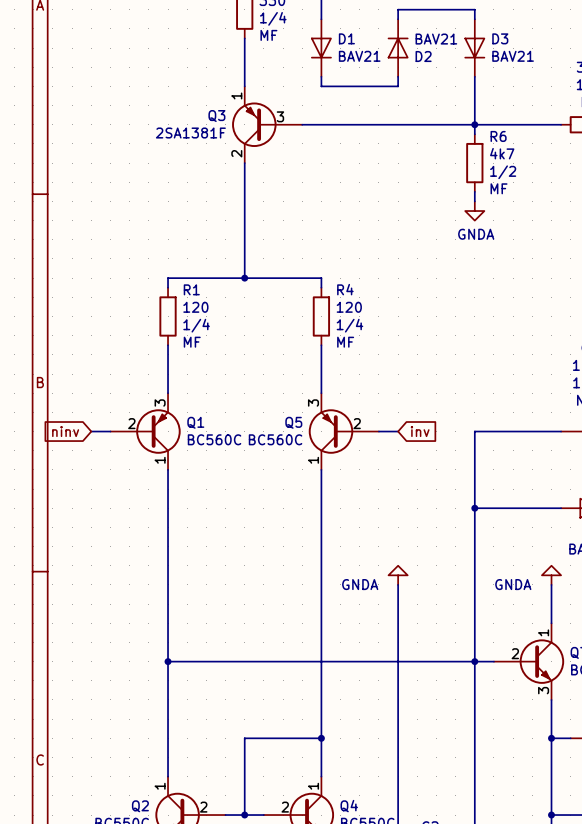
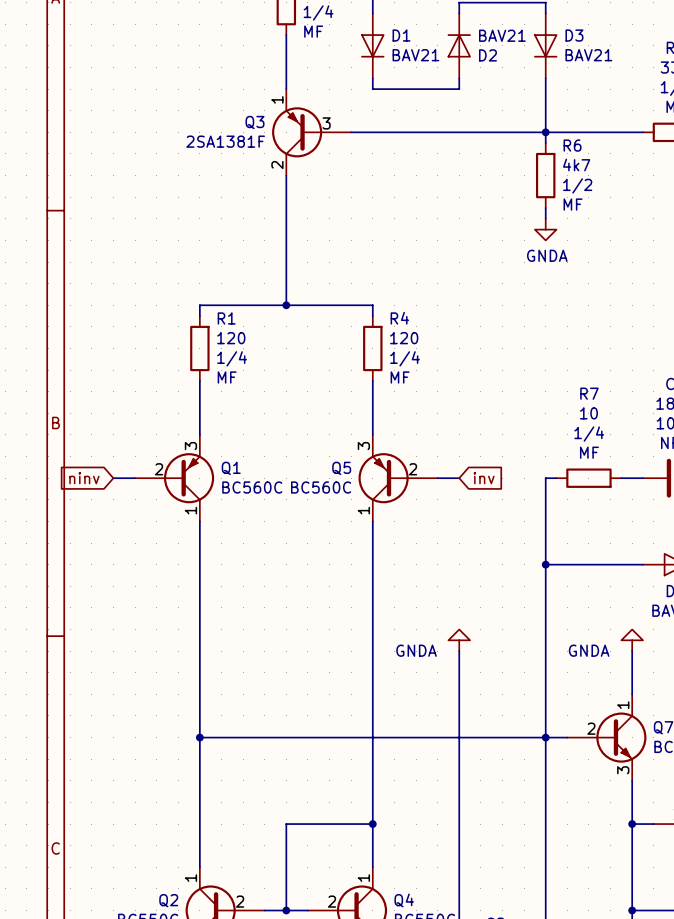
wire: (484, 431) (541, 431) -> none
R7: none -> 10 (588, 478)

